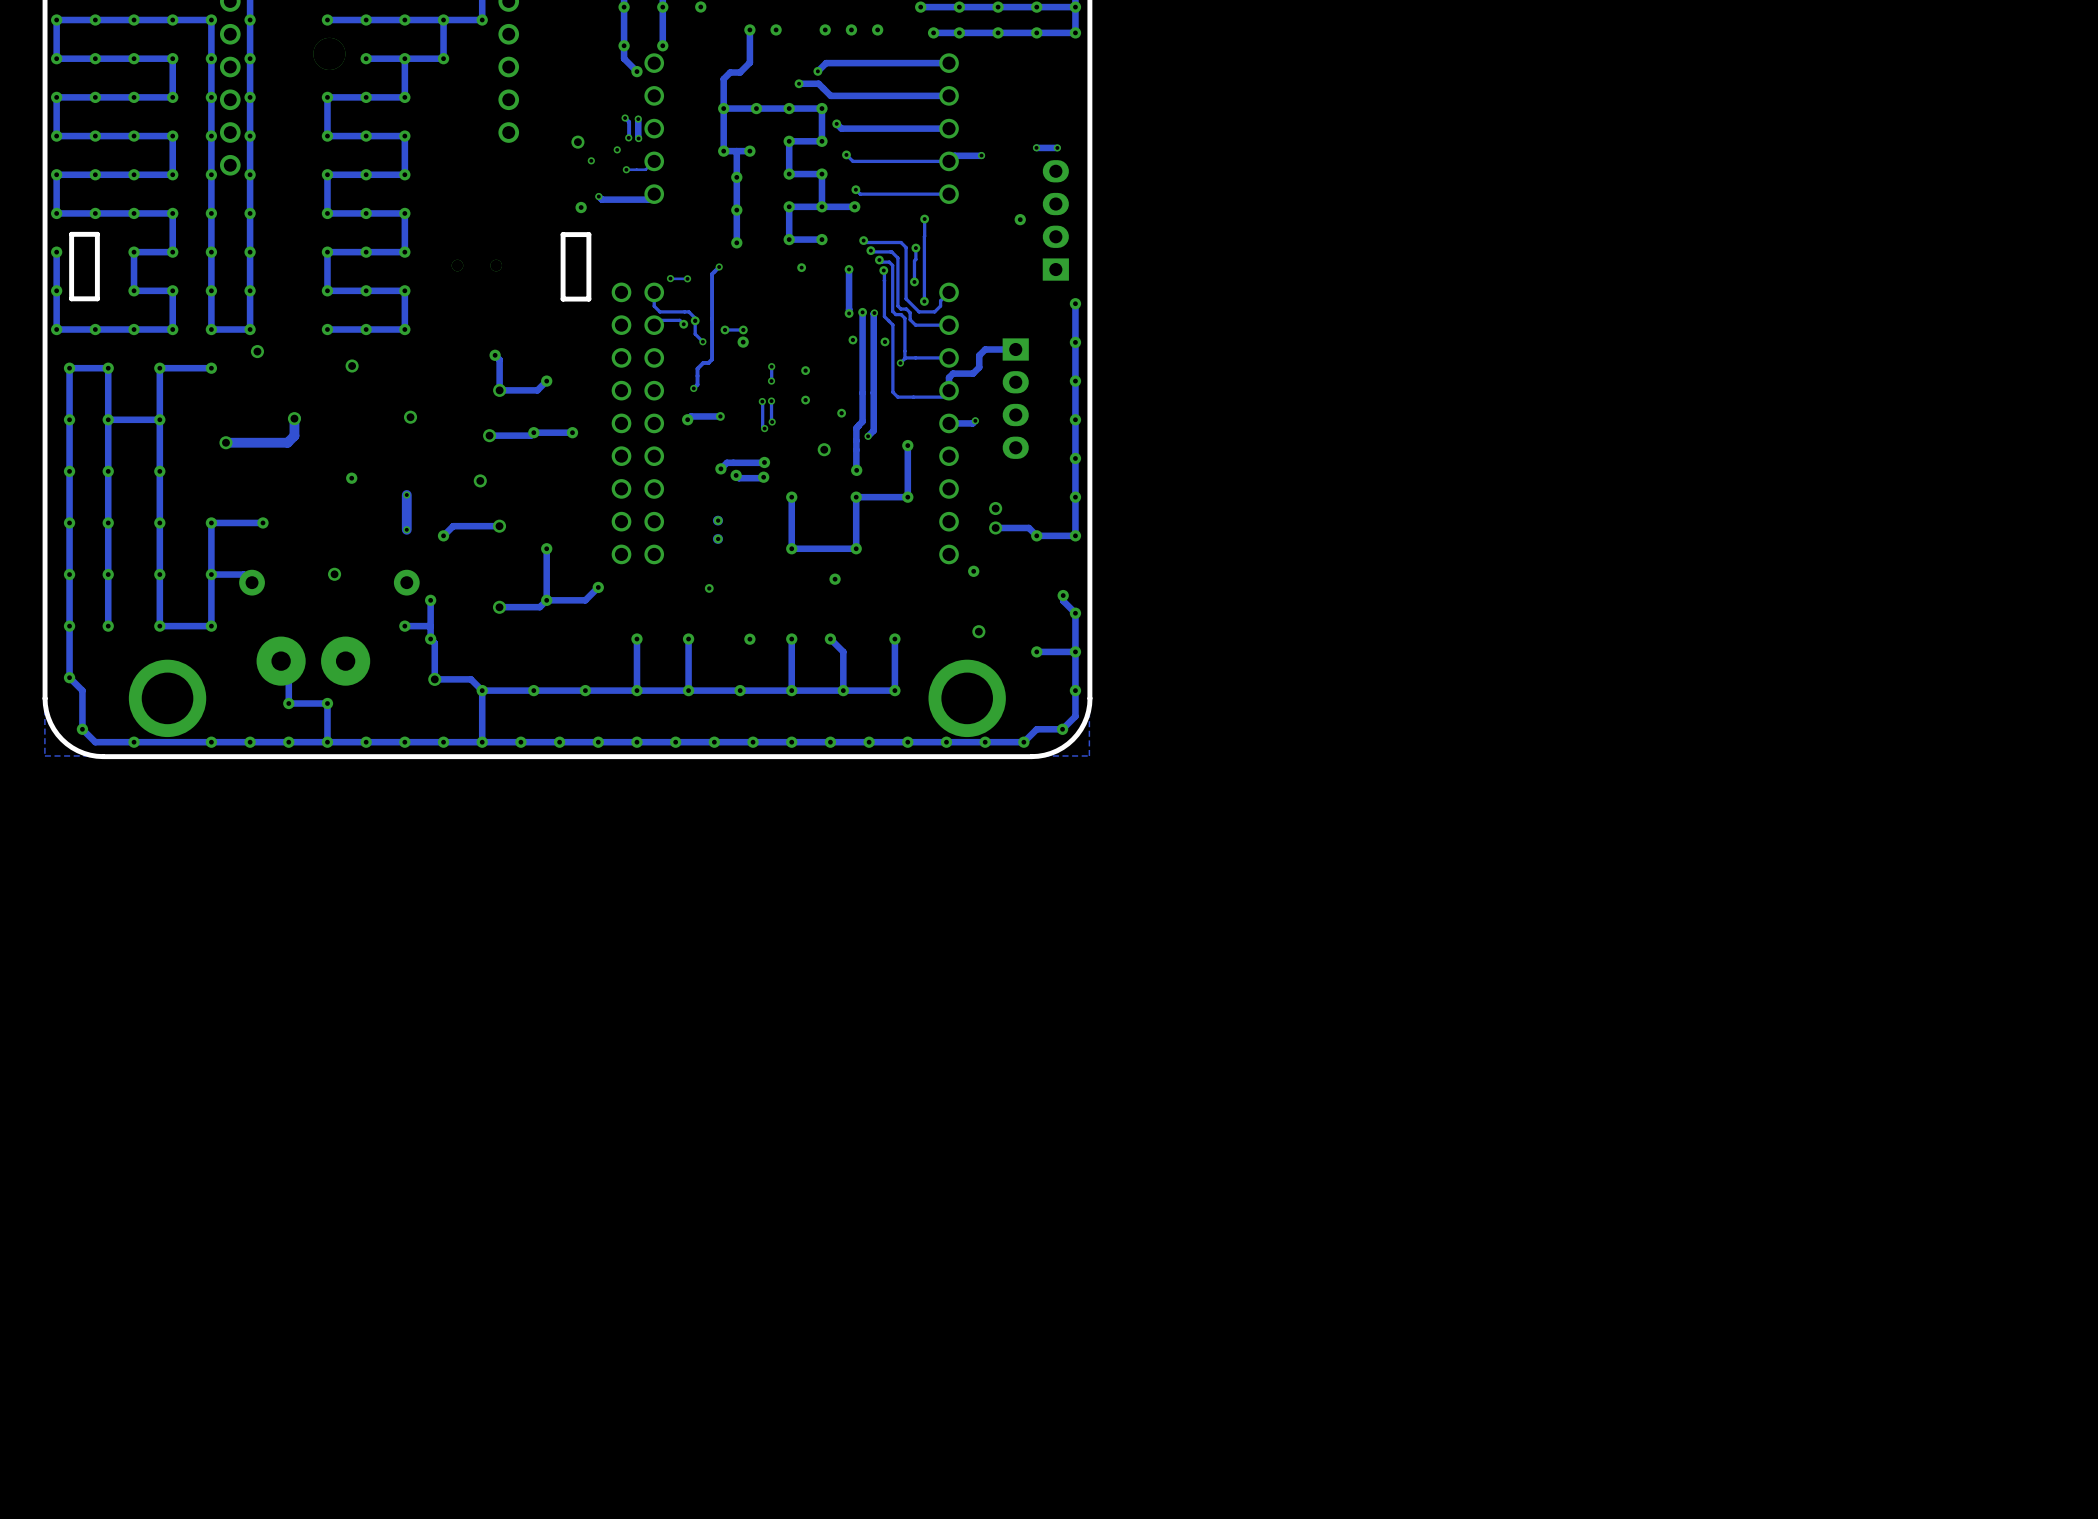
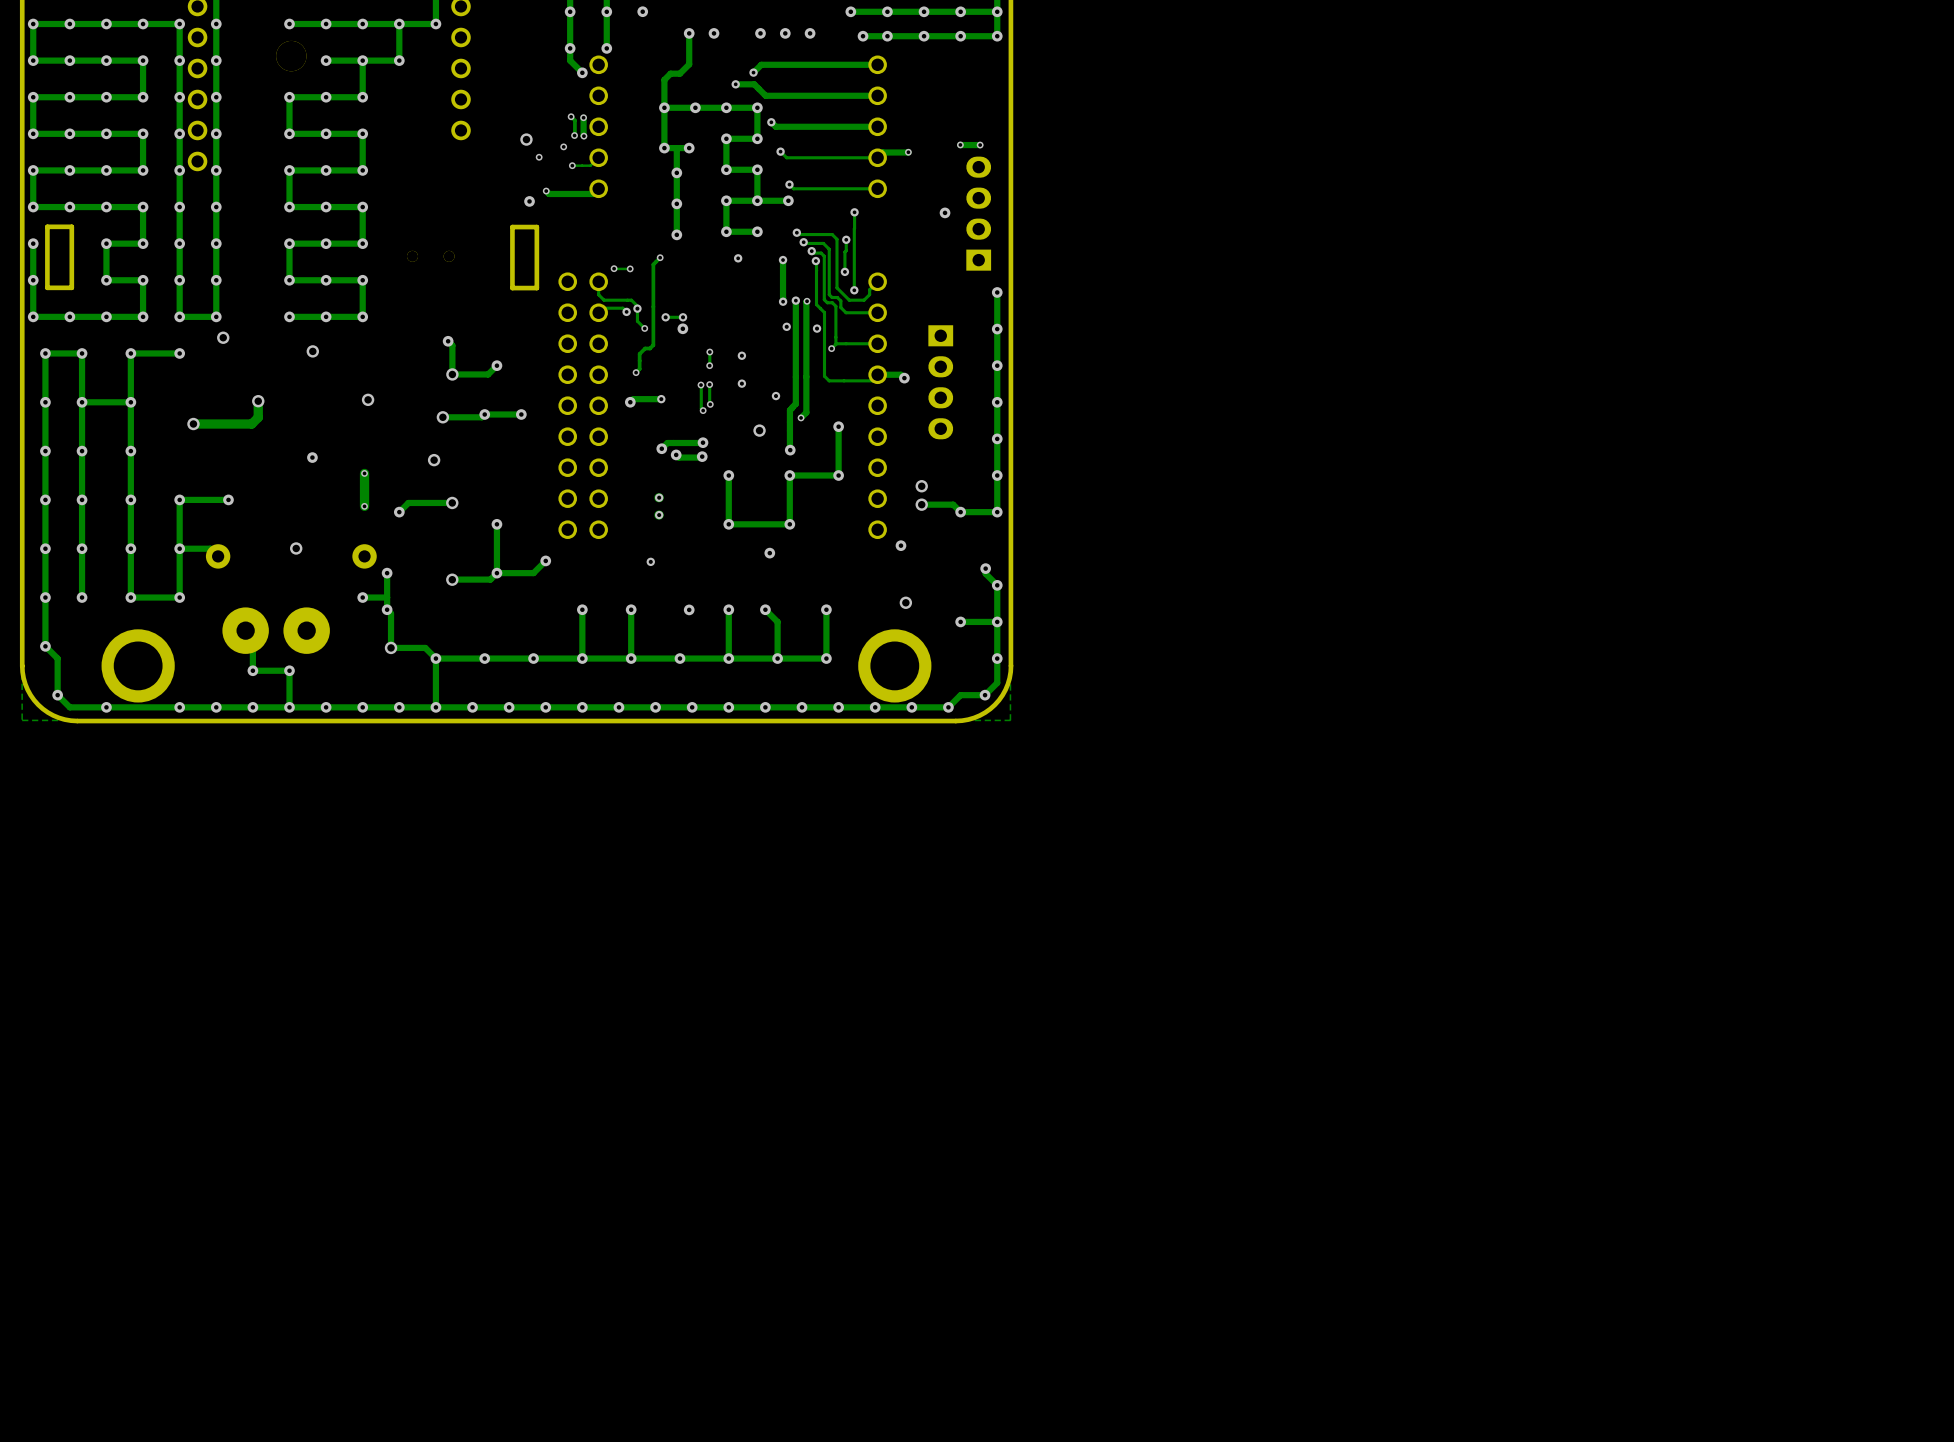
track: (1015, 349) (985, 349) (979, 355) (979, 367) (973, 373) (953, 373) (949, 377) (949, 390) -> (904, 378) (901, 374) (877, 374)
via: none -> (904, 378)
track: (975, 420) (972, 423) (949, 423) -> none
via: (975, 420) -> none

